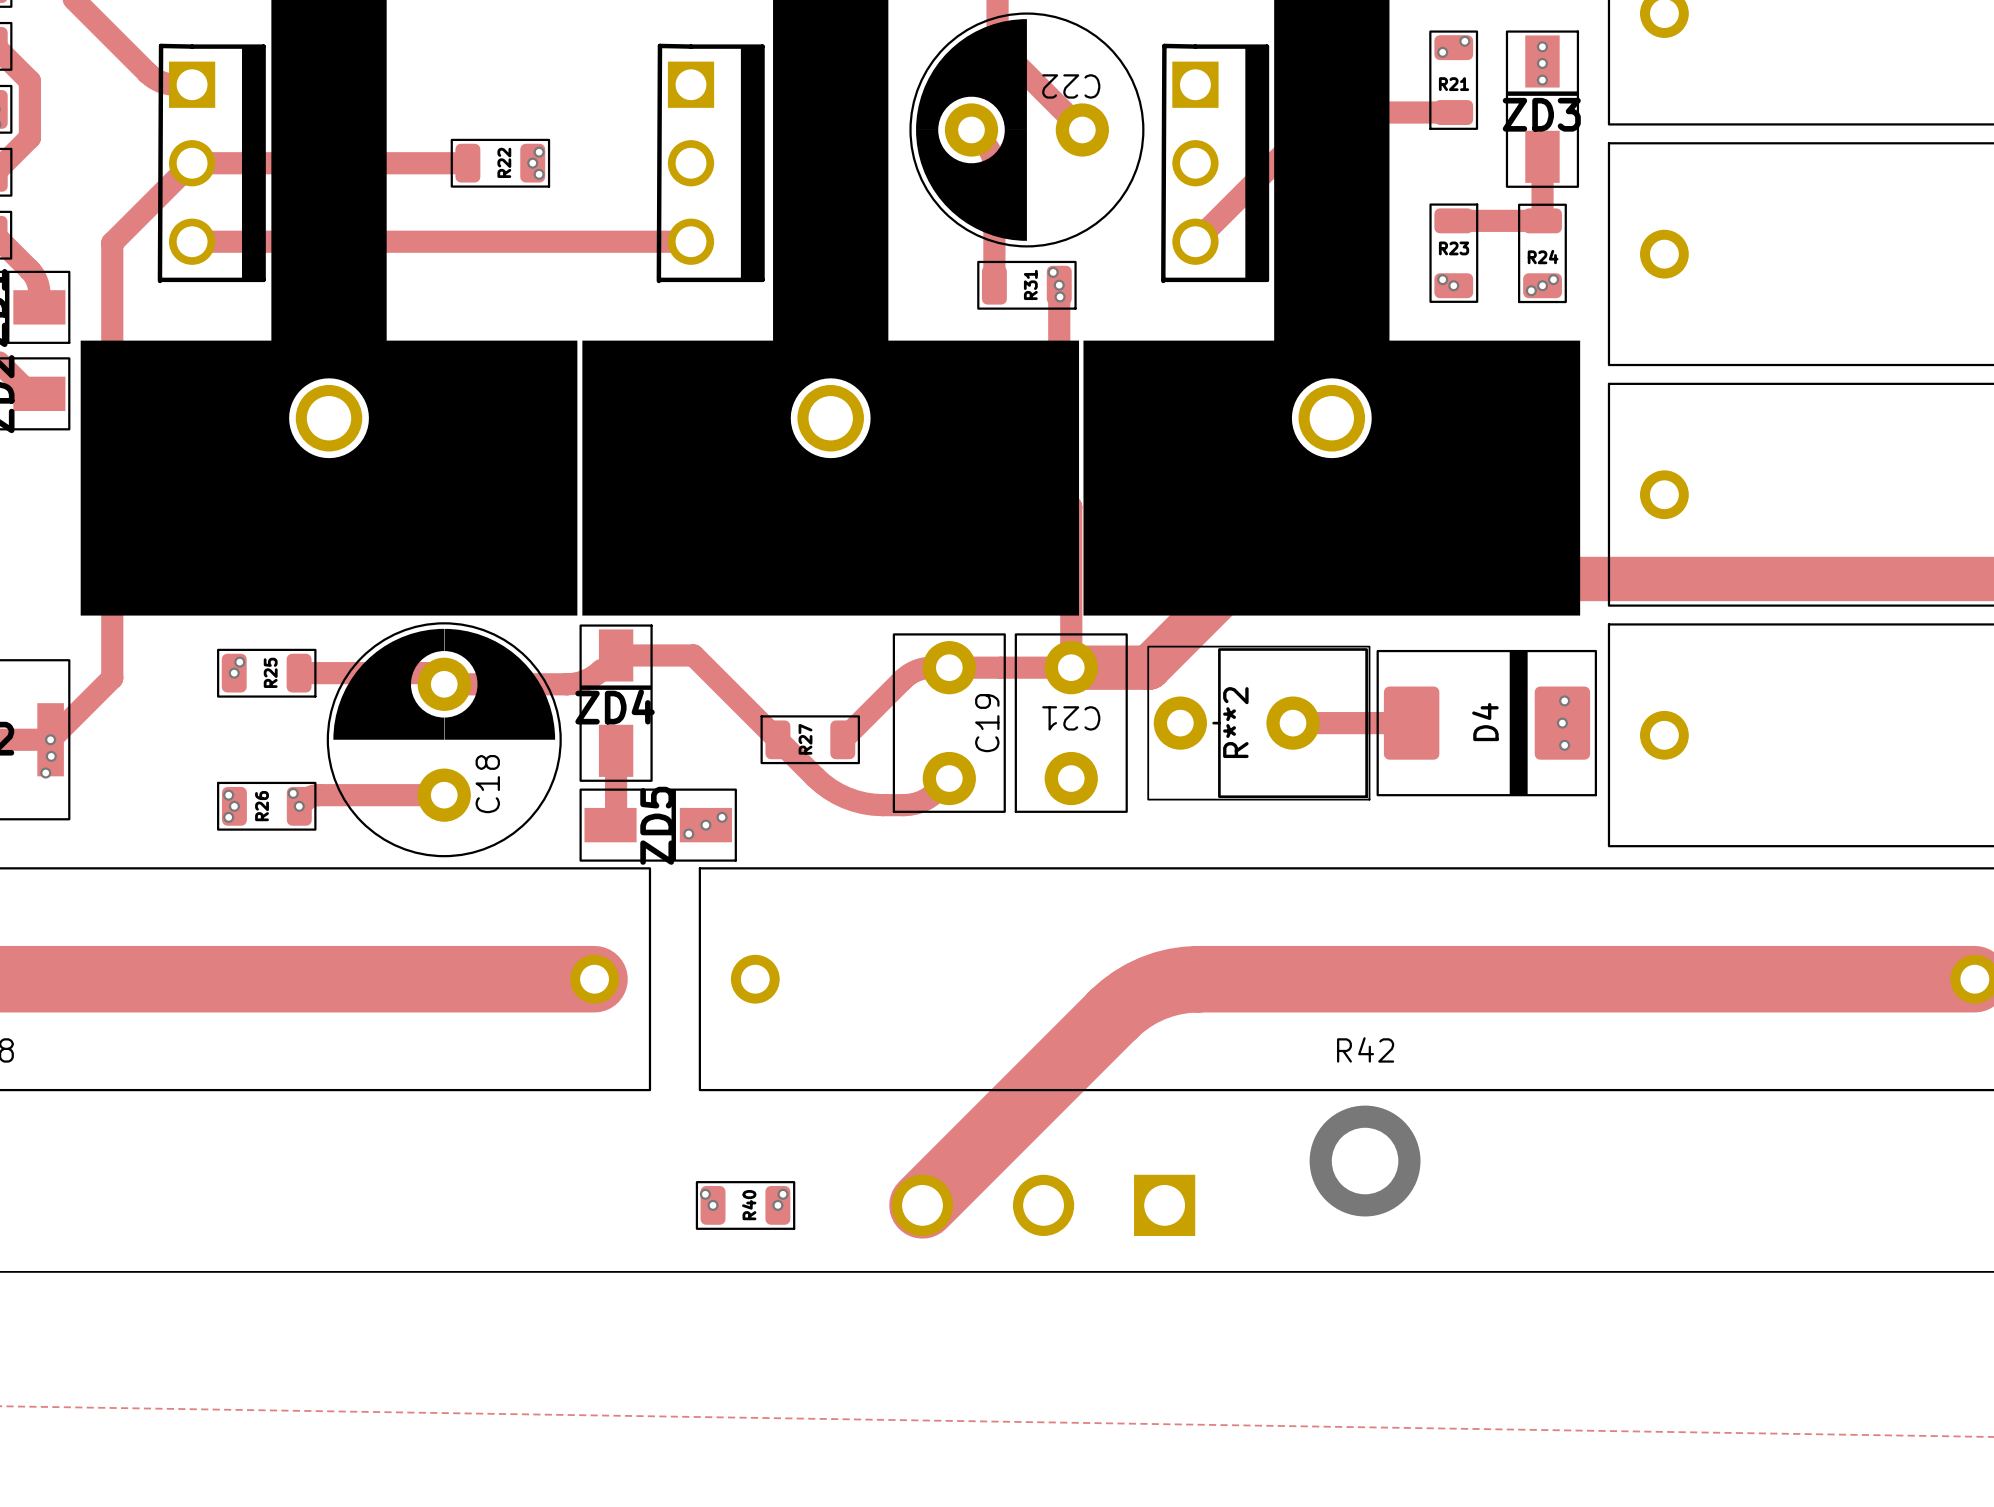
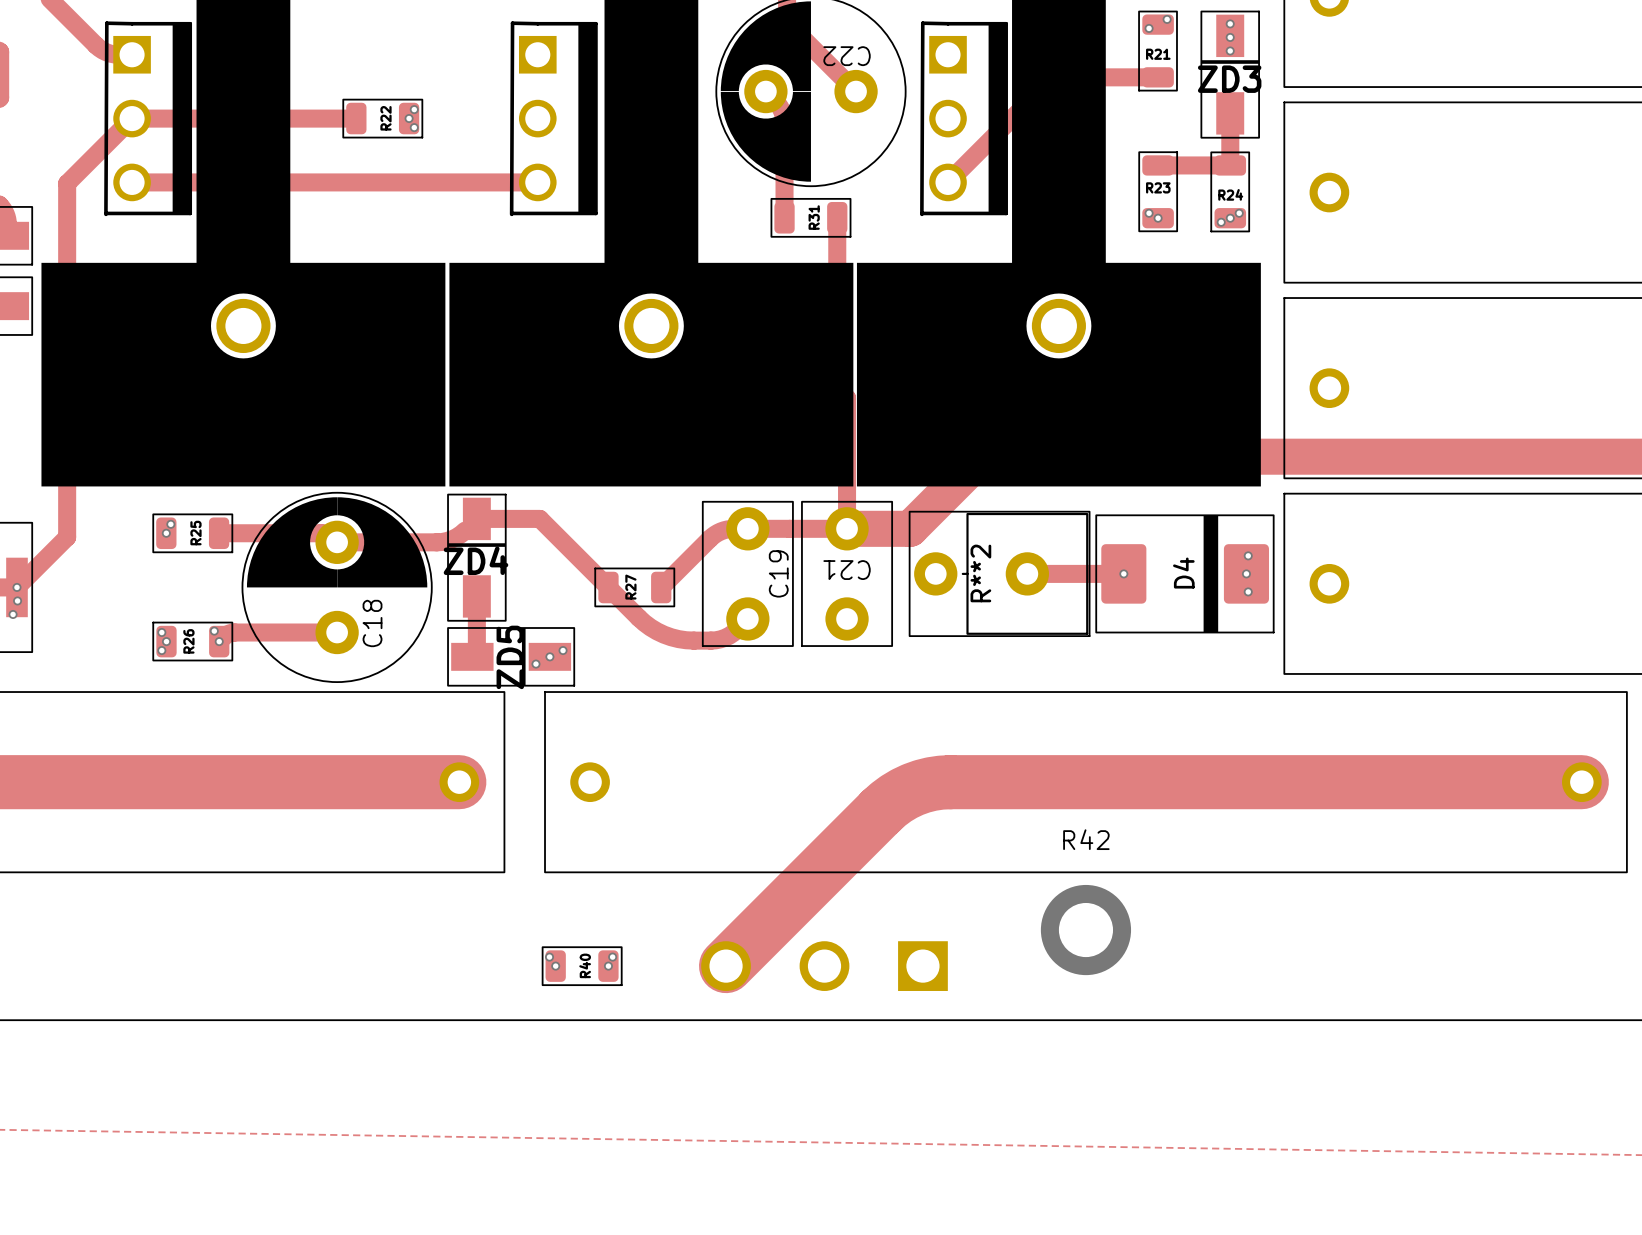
via: (1053, 272) -> none
via: (1059, 285) -> none
via: (1060, 296) -> none
via: none -> (1123, 573)

